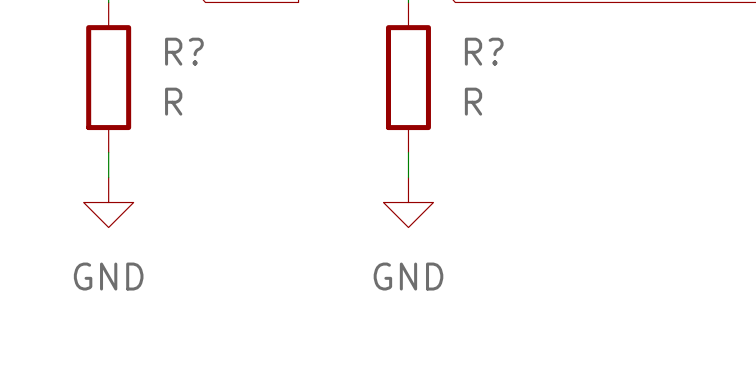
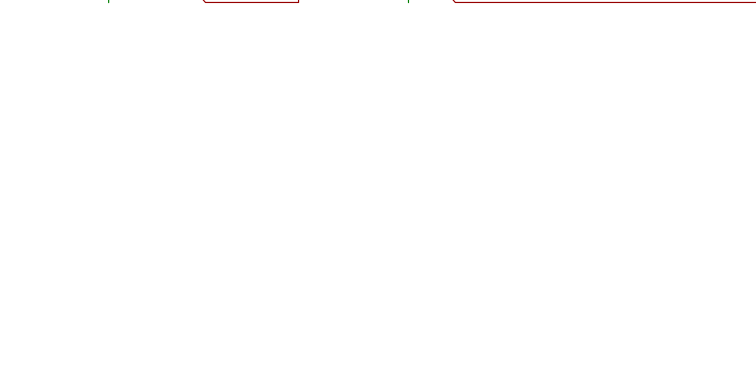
R?: R (108, 77) -> none
R?: R (408, 77) -> none
wire: (108, 152) (108, 177) -> none
wire: (408, 152) (408, 177) -> none
power symbol: GND (108, 202) -> none
power symbol: GND (408, 202) -> none

